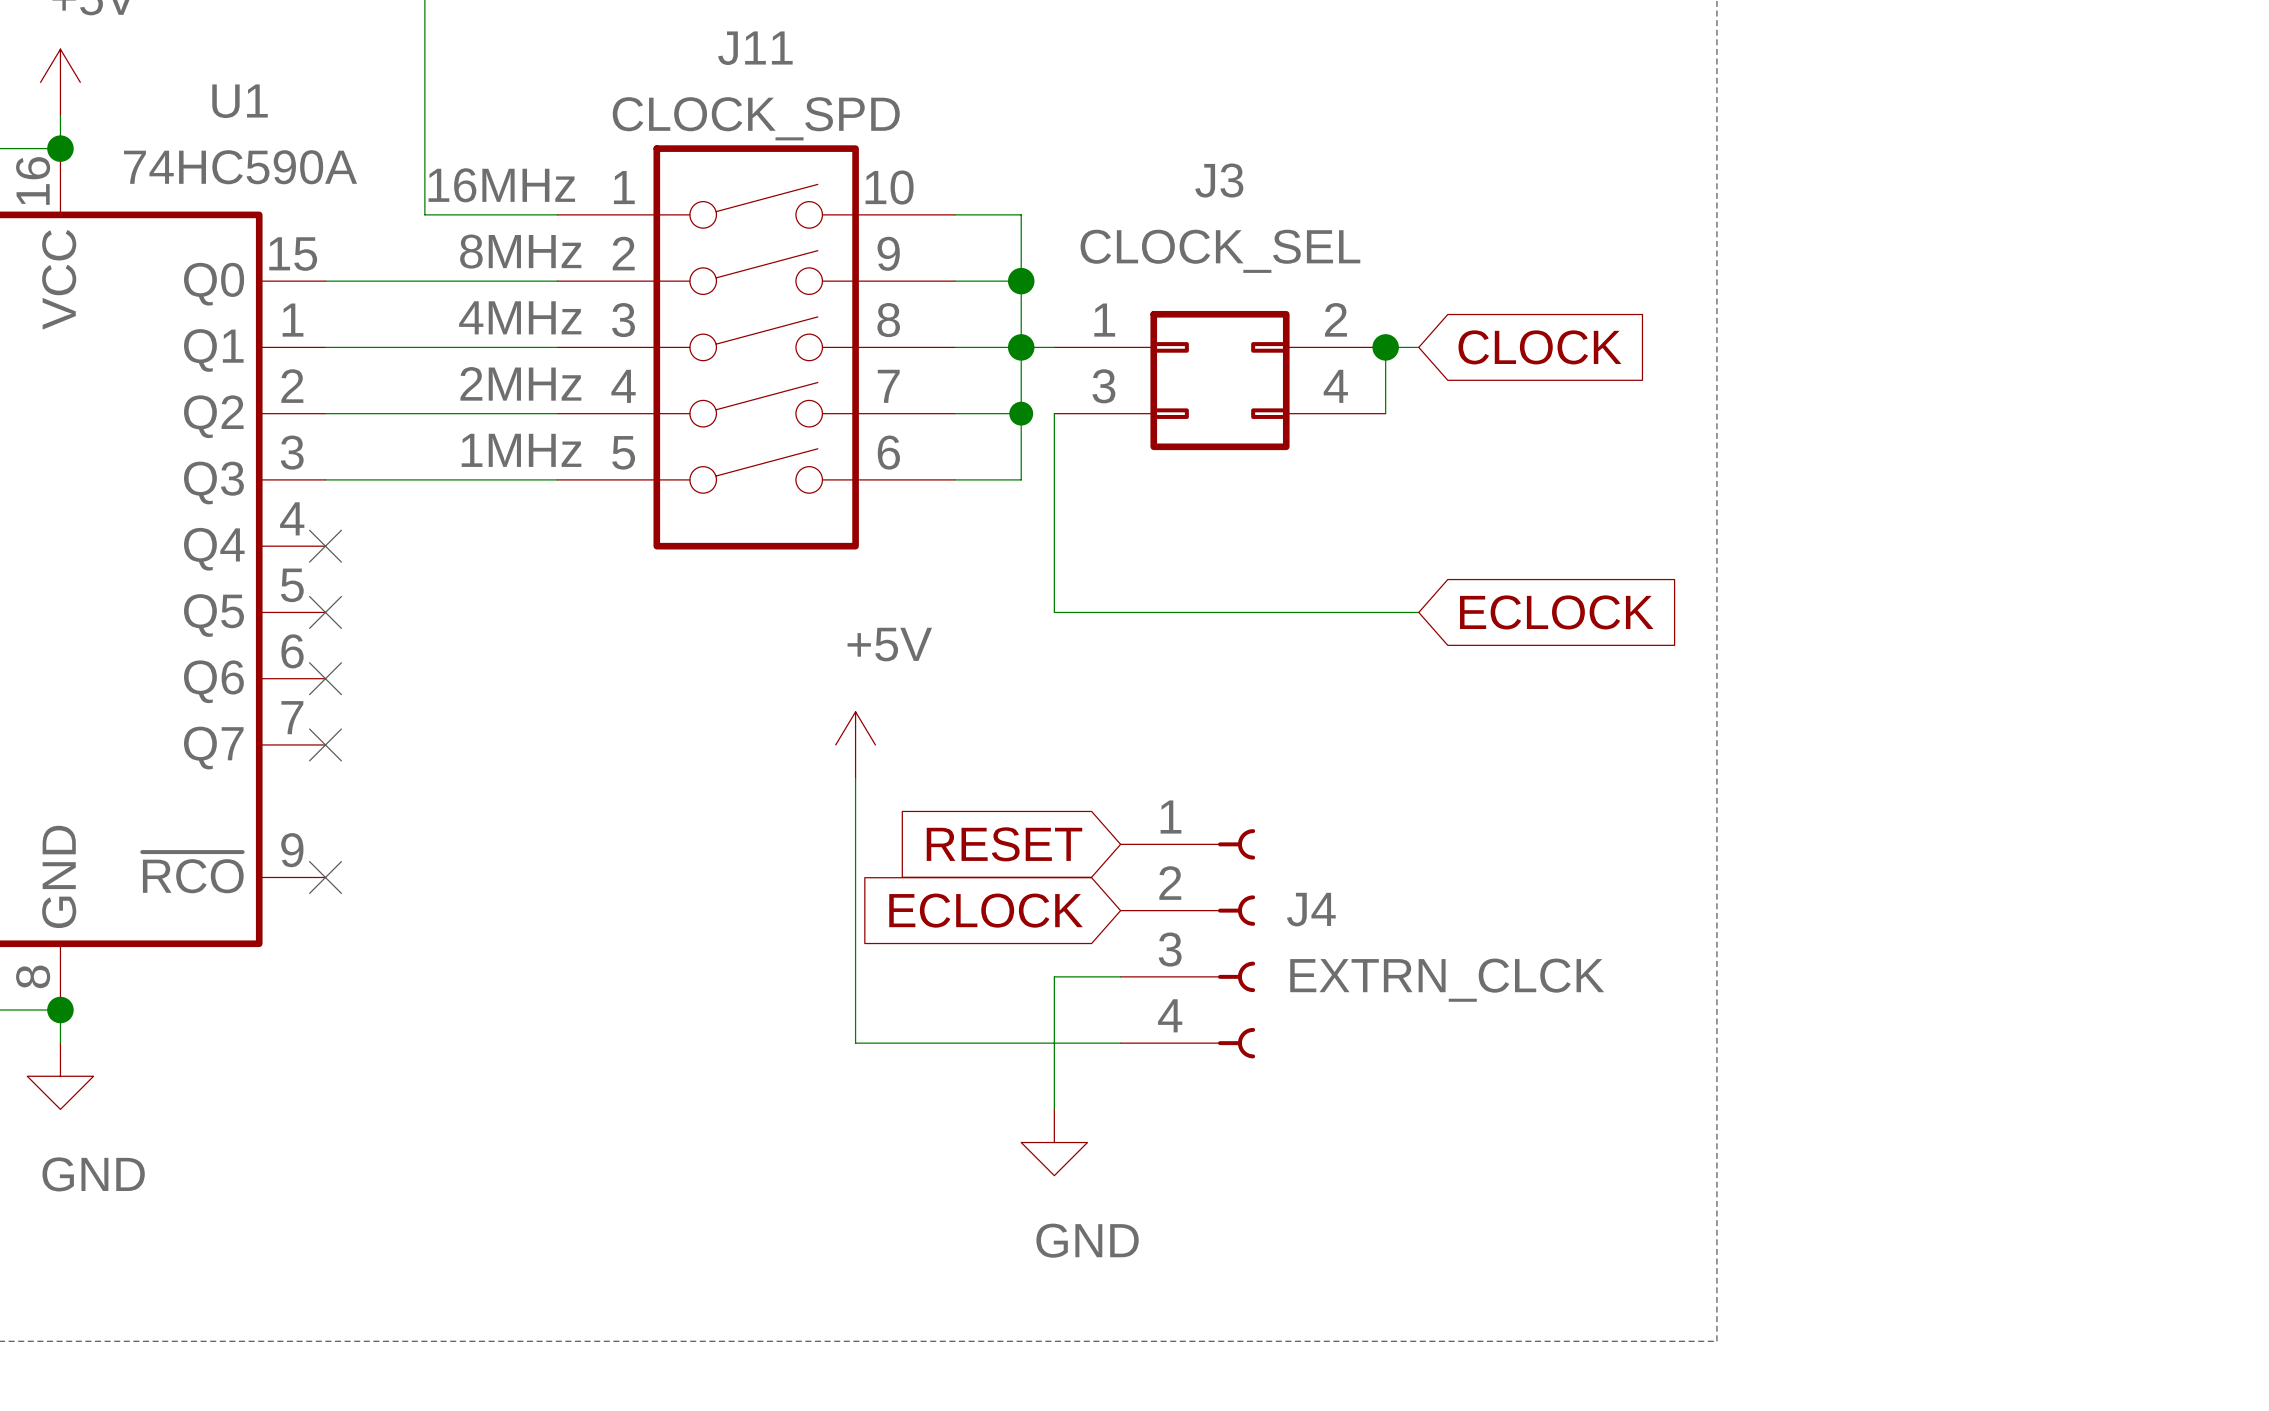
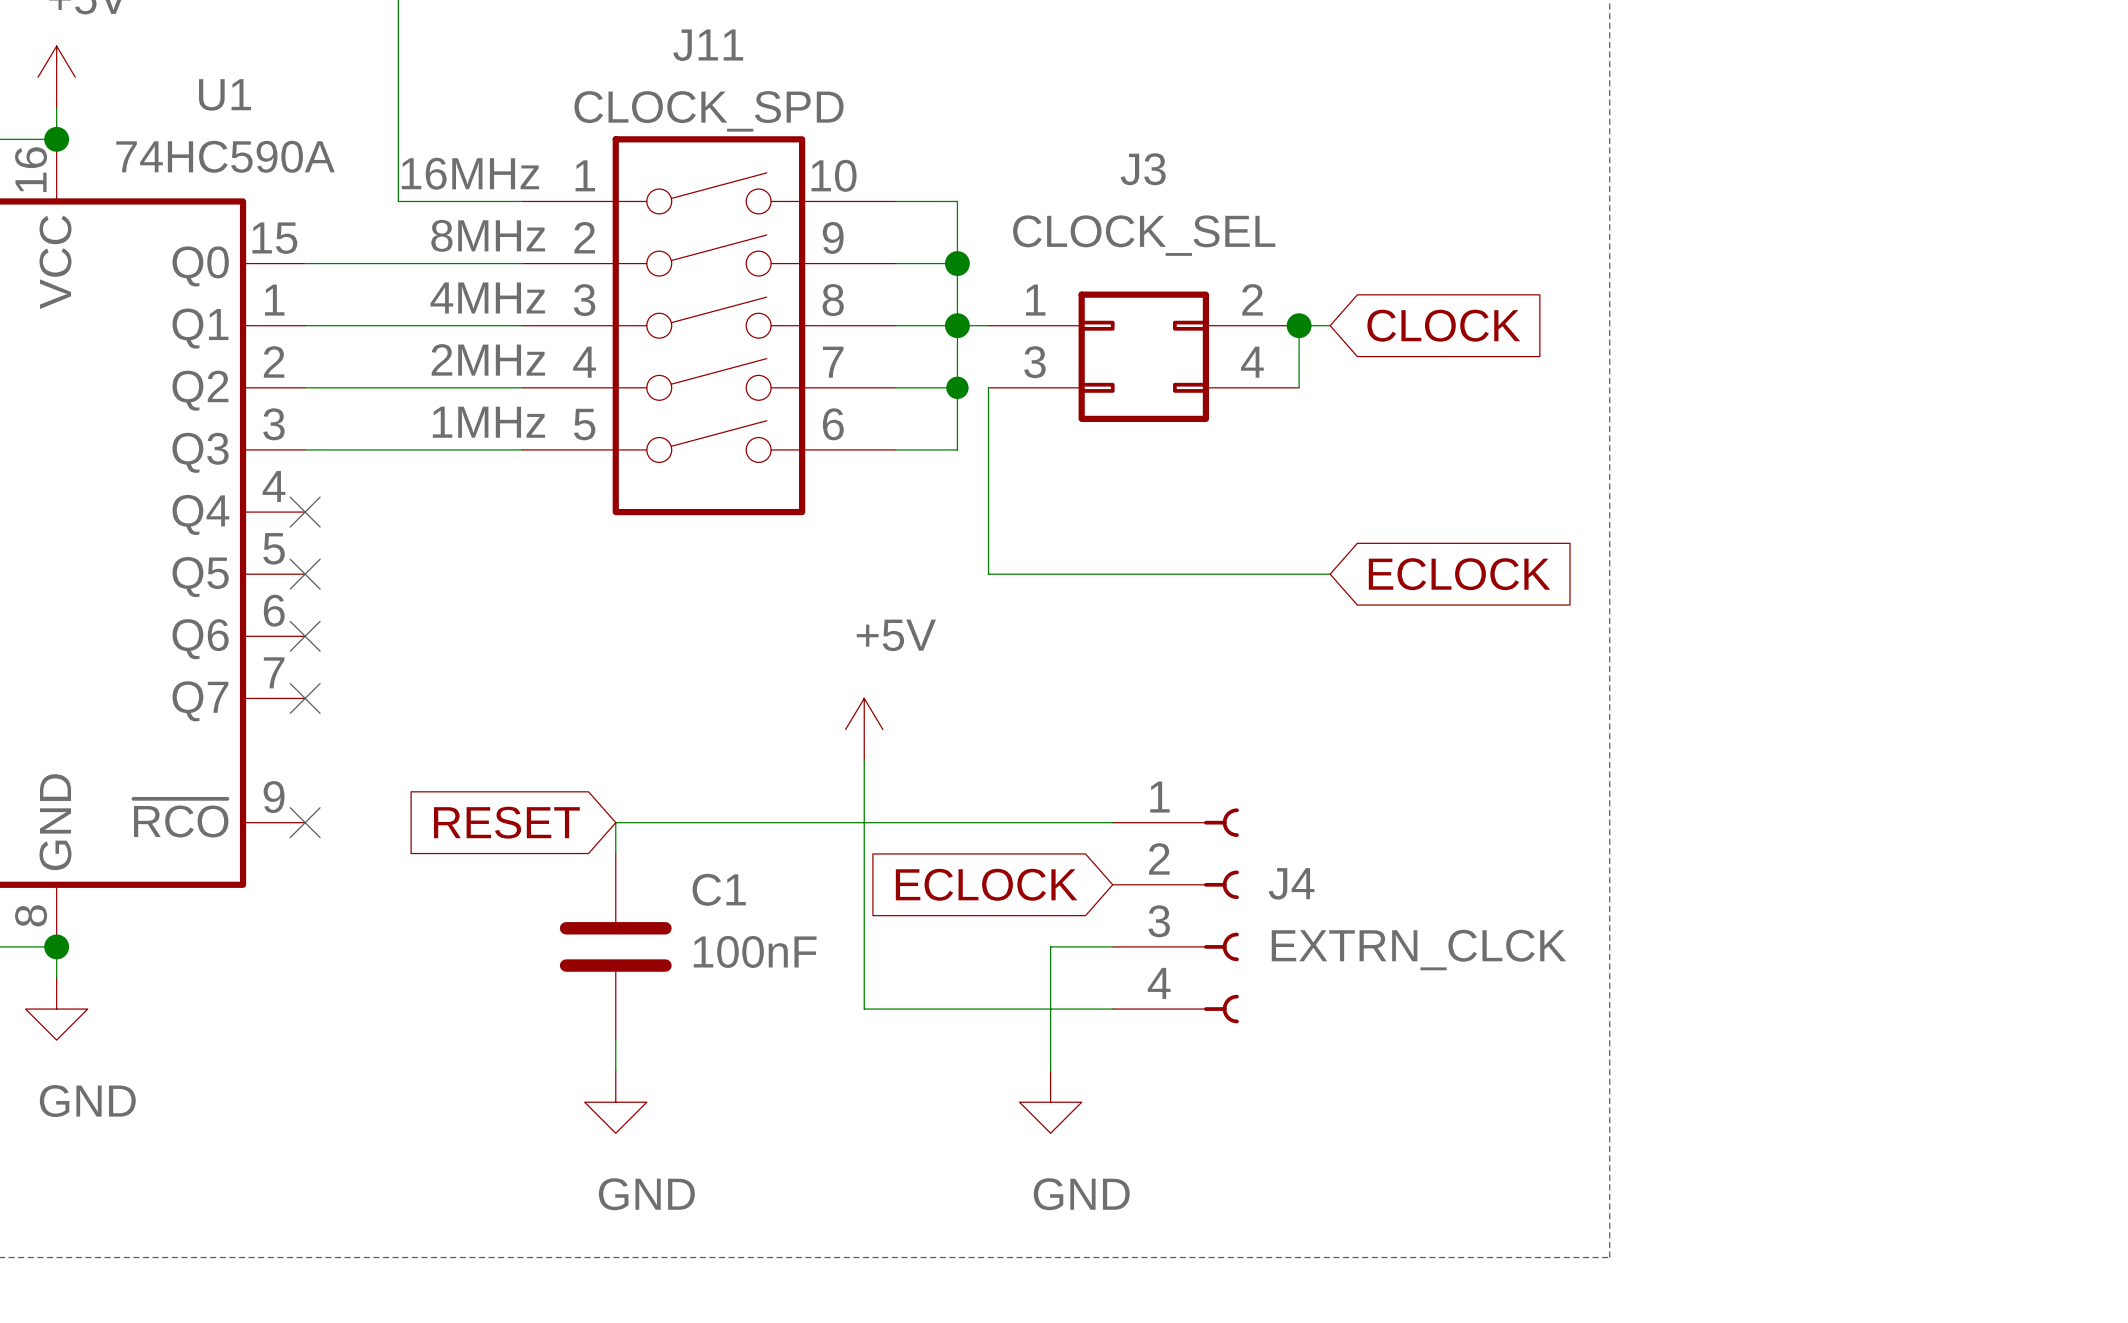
power symbol position: +5V (855, 744) -> +5V (864, 729)
wire: (855, 778) (855, 1043) (1120, 1043) -> (864, 760) (864, 1009) (1112, 1009)
global label position: RESET (1004, 844) -> RESET (506, 822)
wire: none -> (1112, 822) (615, 822) (615, 853)
global label position: ECLOCK (986, 910) -> ECLOCK (986, 884)
J4 position: (1187, 943) -> (1175, 915)
wire: (1120, 976) (1054, 976) (1054, 1109) -> (1112, 946) (1050, 946) (1050, 1071)
C1: none -> 100nF (615, 946)
wire: none -> (615, 1040) (615, 1071)
power symbol position: GND (1054, 1142) -> GND (1050, 1102)
power symbol: none -> GND (615, 1102)

